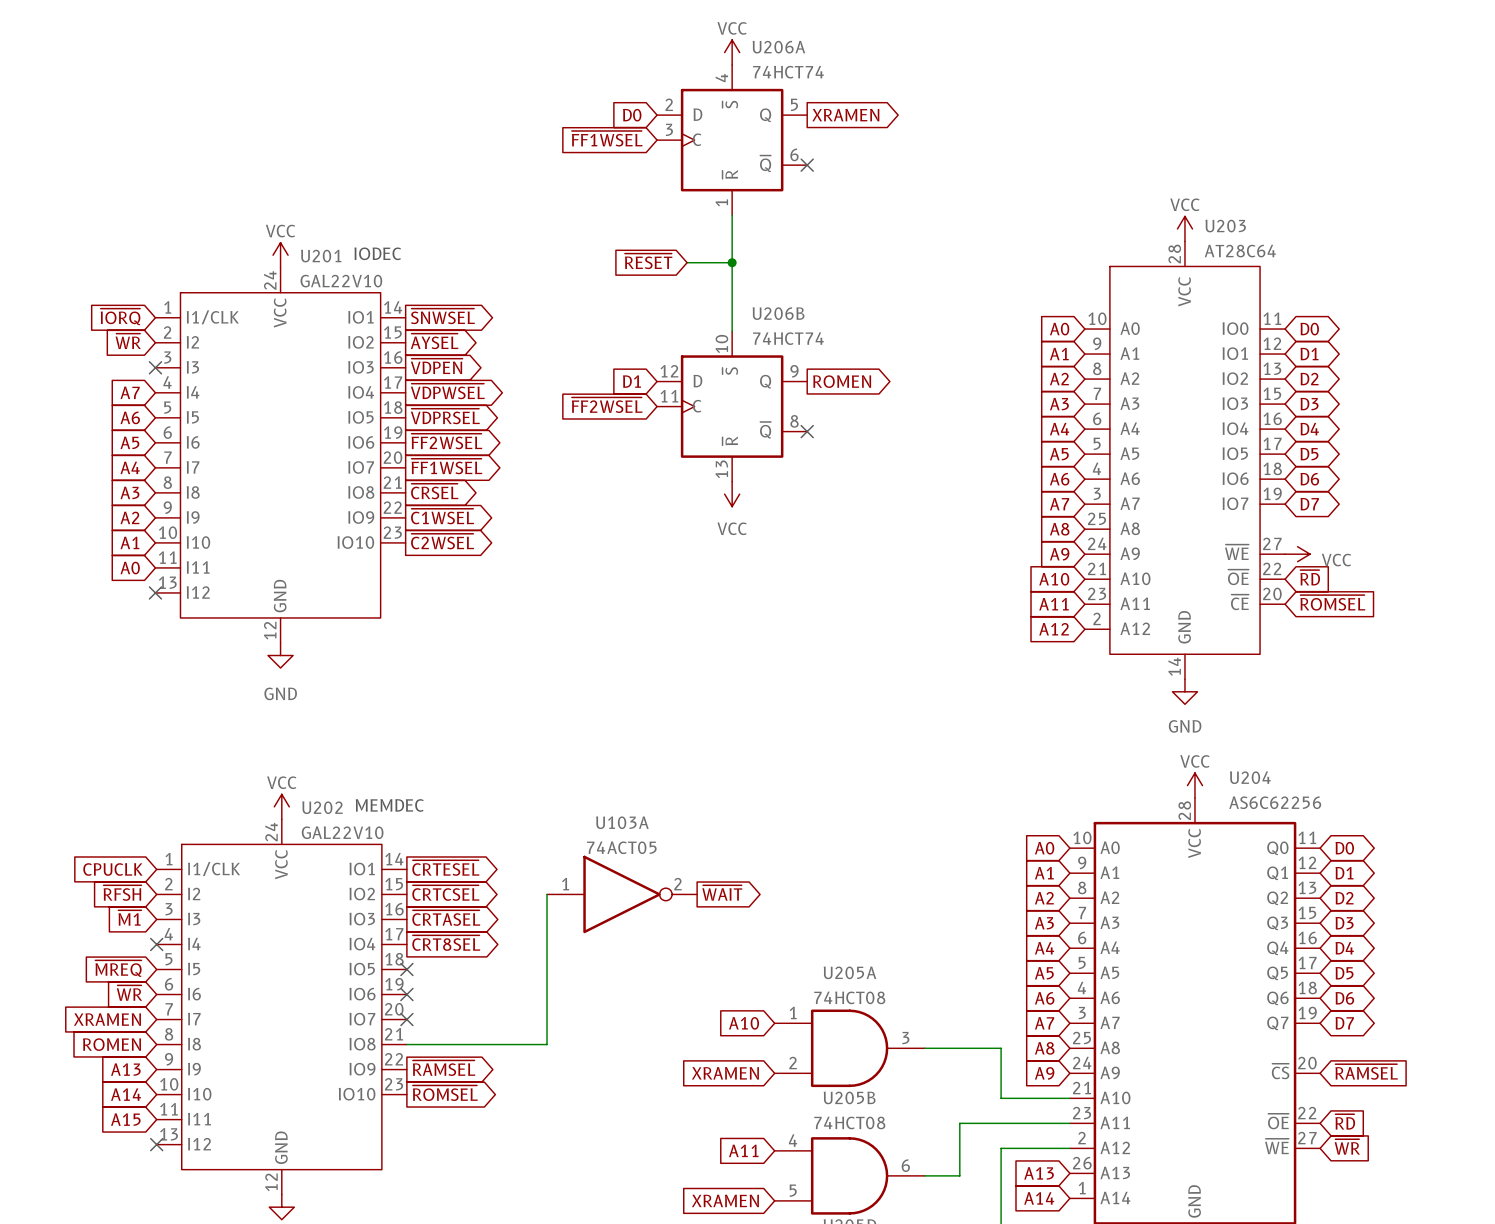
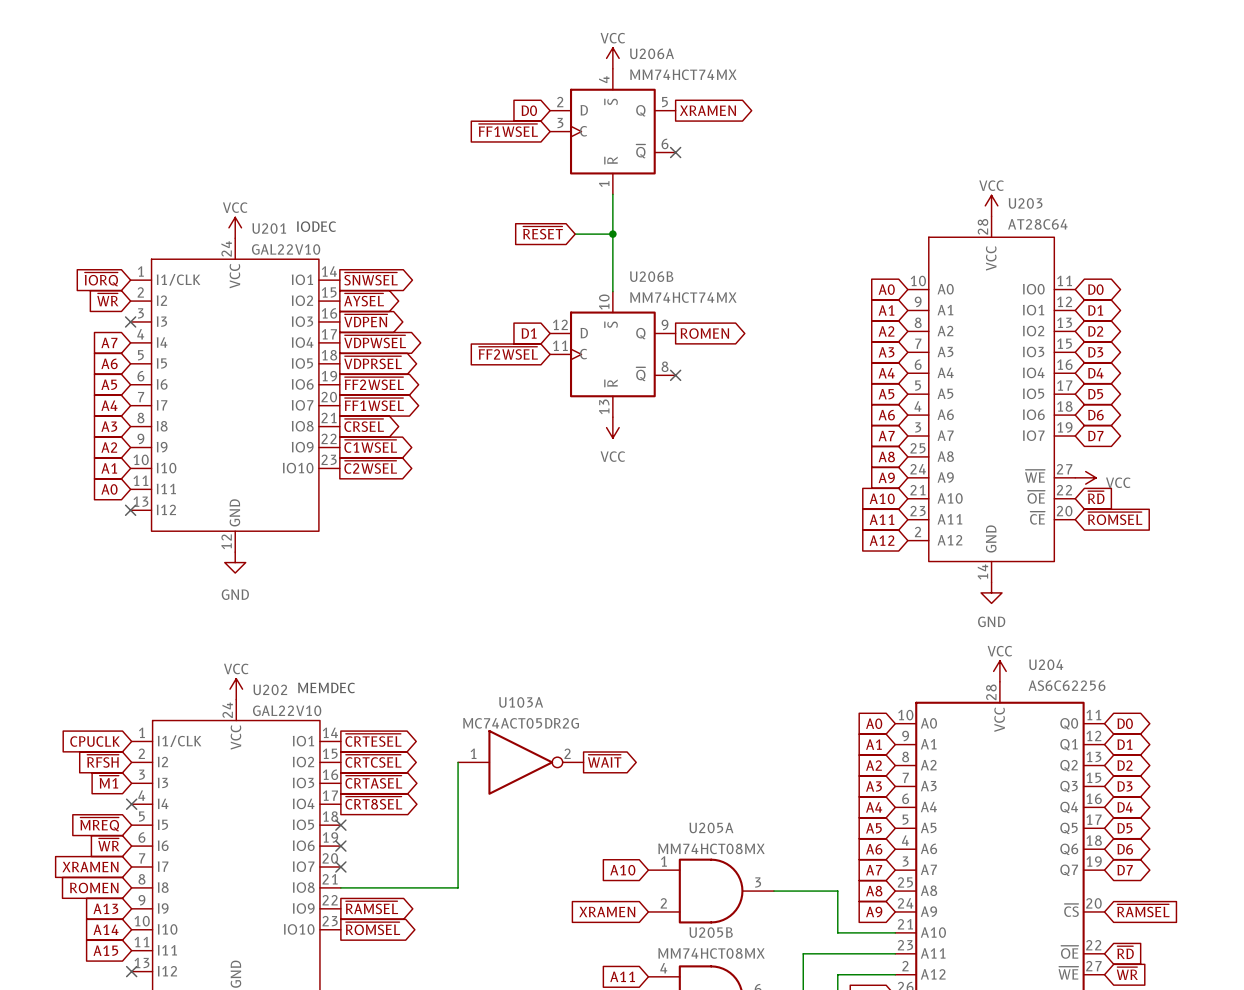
U206A value: 74HCT74 (788, 72) -> MM74HCT74MX (683, 74)
U206B value: 74HCT74 (788, 338) -> MM74HCT74MX (683, 297)
U103A value: 74ACT05 (621, 847) -> MC74ACT05DR2G (521, 723)
U205A value: 74HCT08 (849, 997) -> MM74HCT08MX (711, 848)
U205B value: 74HCT08 (849, 1122) -> MM74HCT08MX (711, 953)

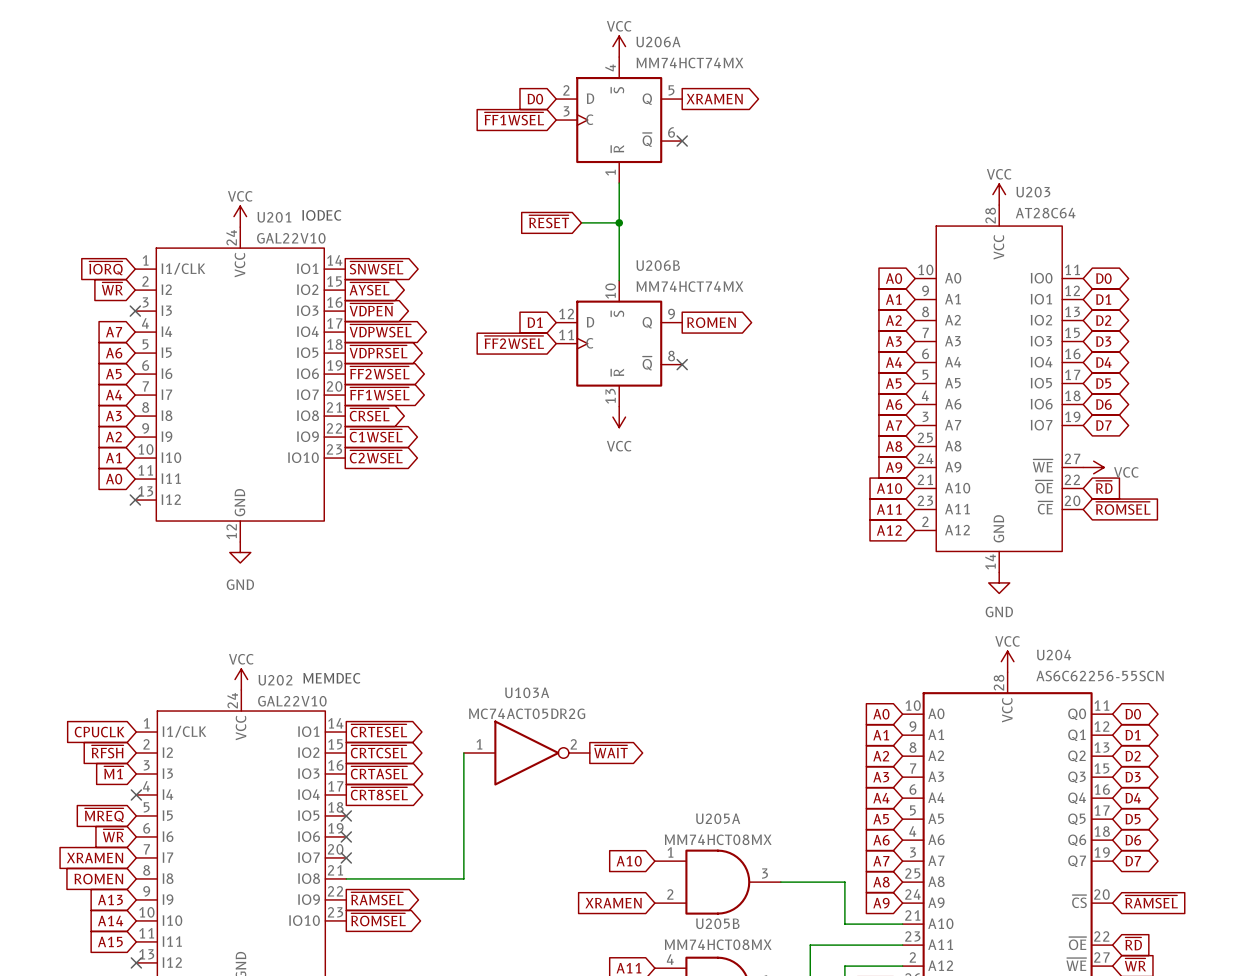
U204 value: AS6C62256 (1067, 685) -> AS6C62256-55SCN (1100, 676)

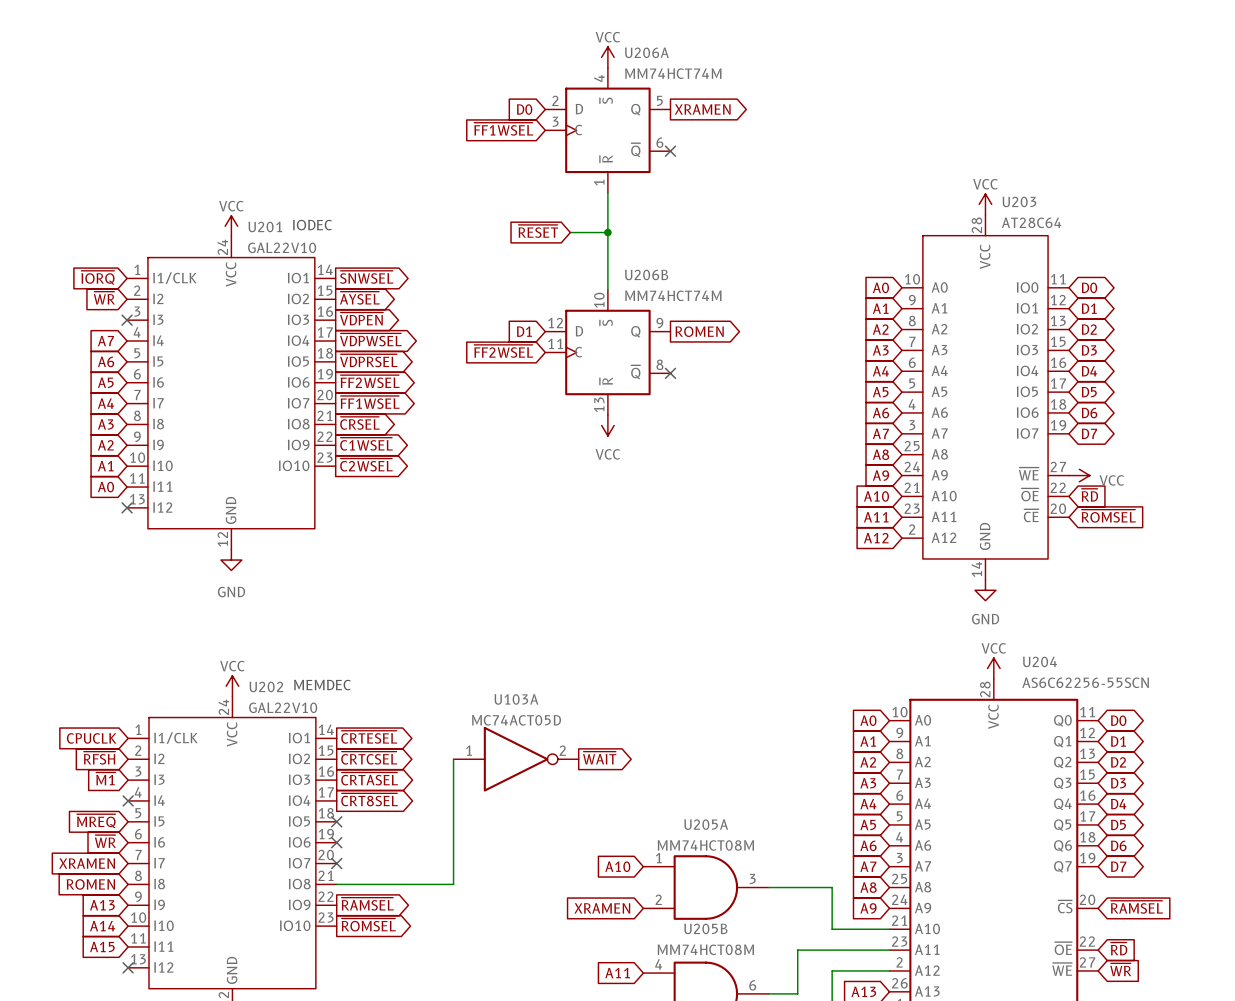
U206A value: MM74HCT74MX (689, 63) -> MM74HCT74M (673, 73)
U206B value: MM74HCT74MX (689, 286) -> MM74HCT74M (673, 295)
U103A value: MC74ACT05DR2G (527, 713) -> MC74ACT05D (516, 720)
U205A value: MM74HCT08MX (718, 839) -> MM74HCT08M (705, 845)
U205B value: MM74HCT08MX (718, 944) -> MM74HCT08M (705, 949)

